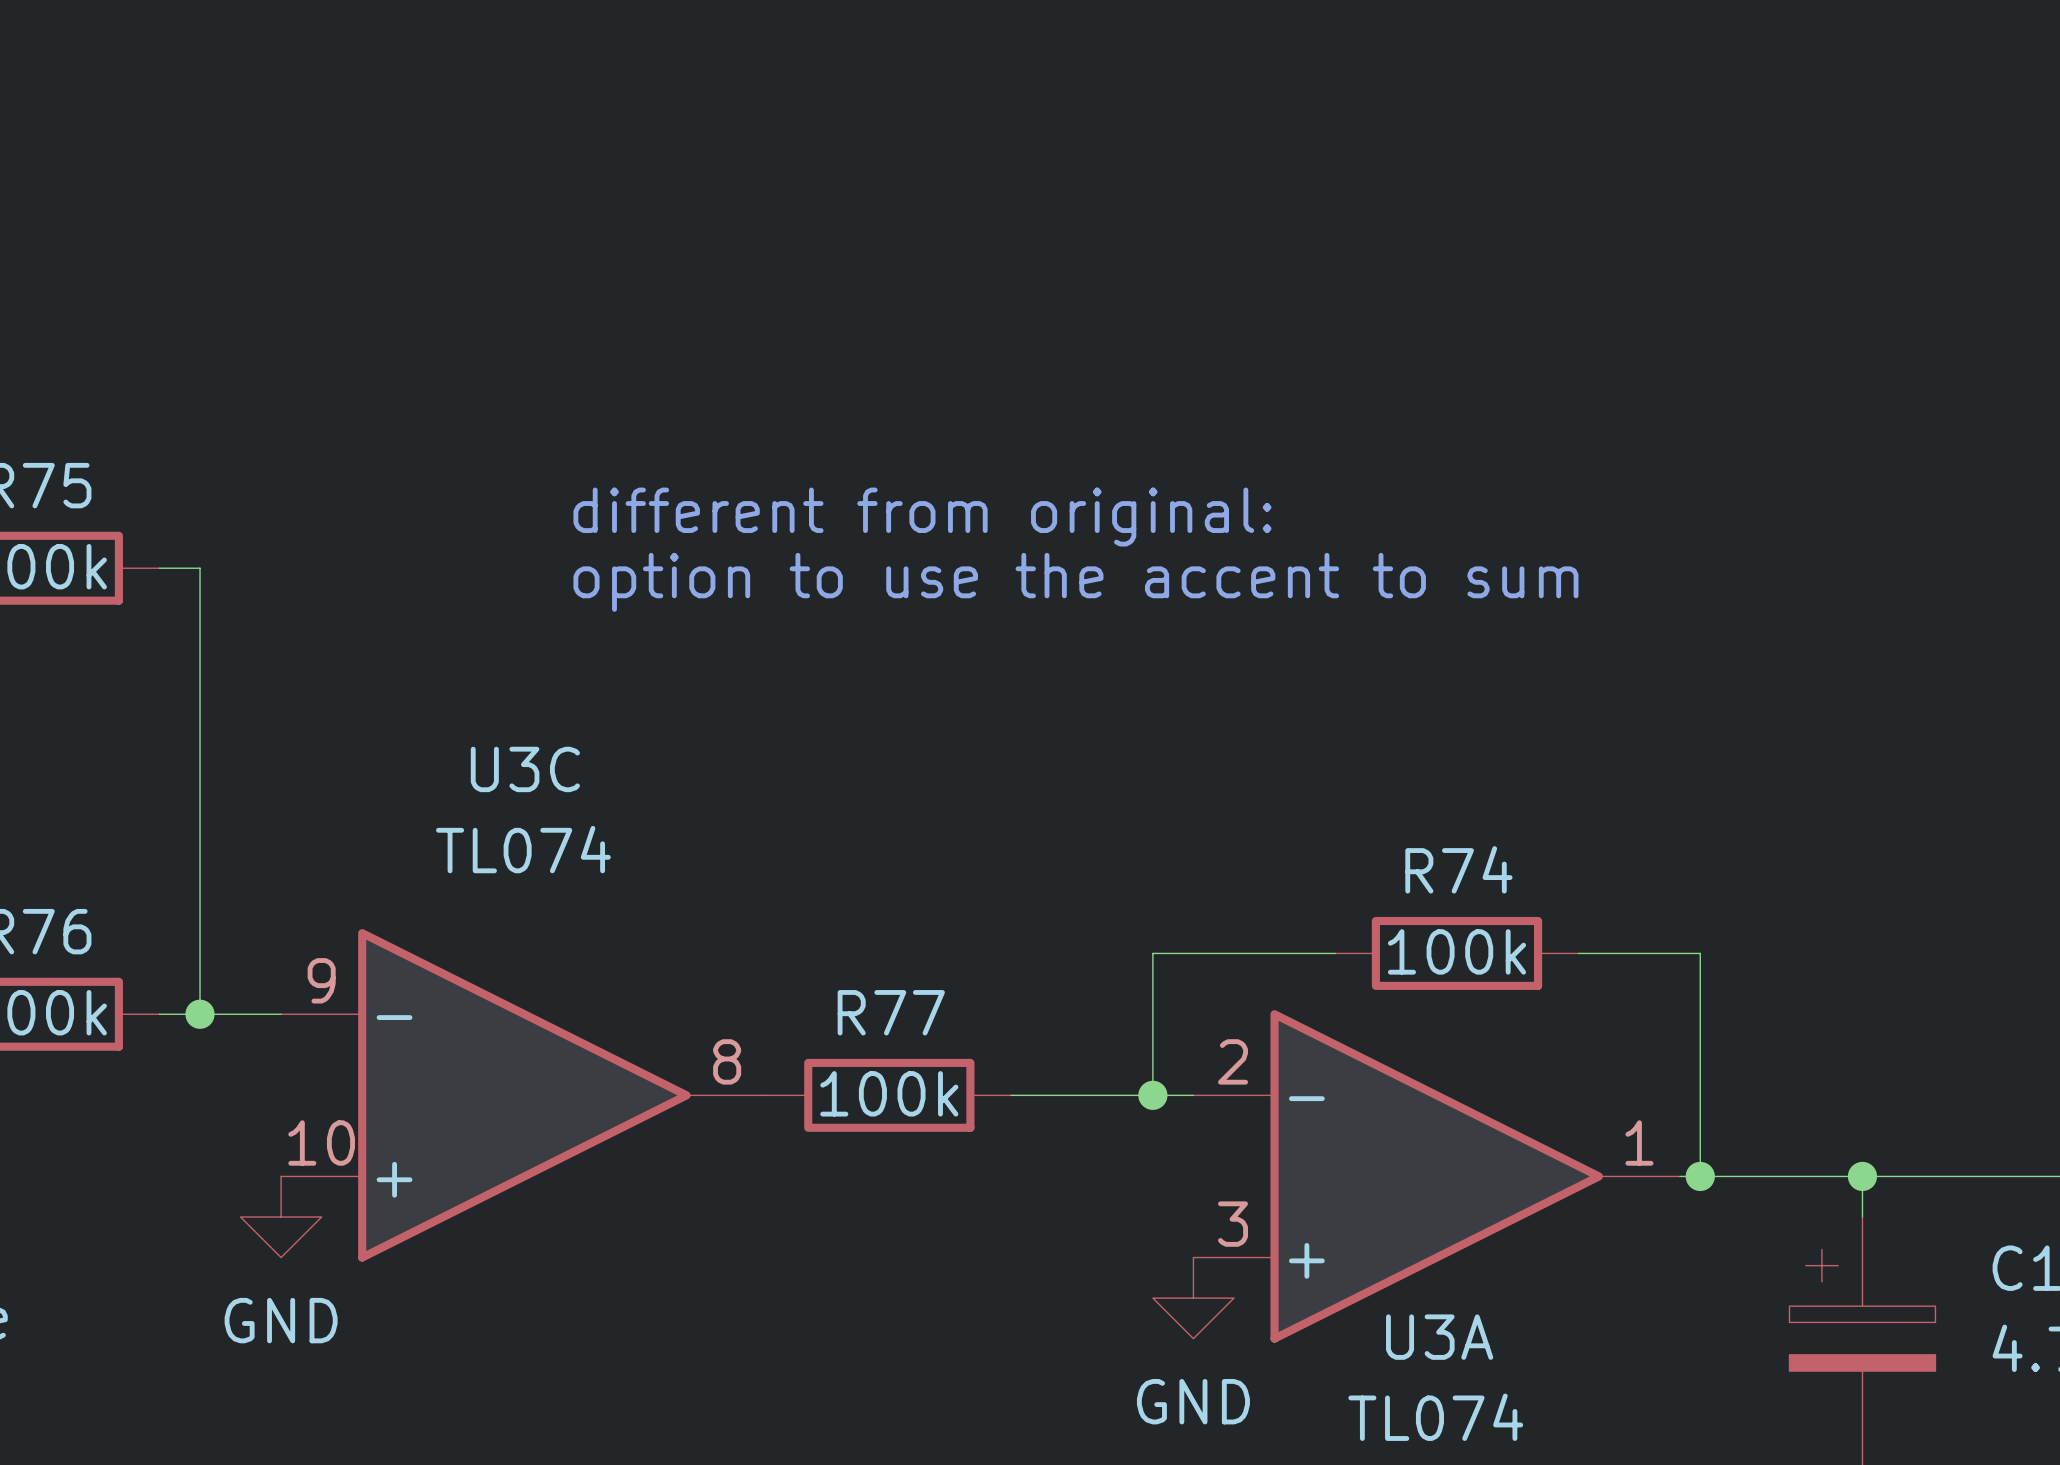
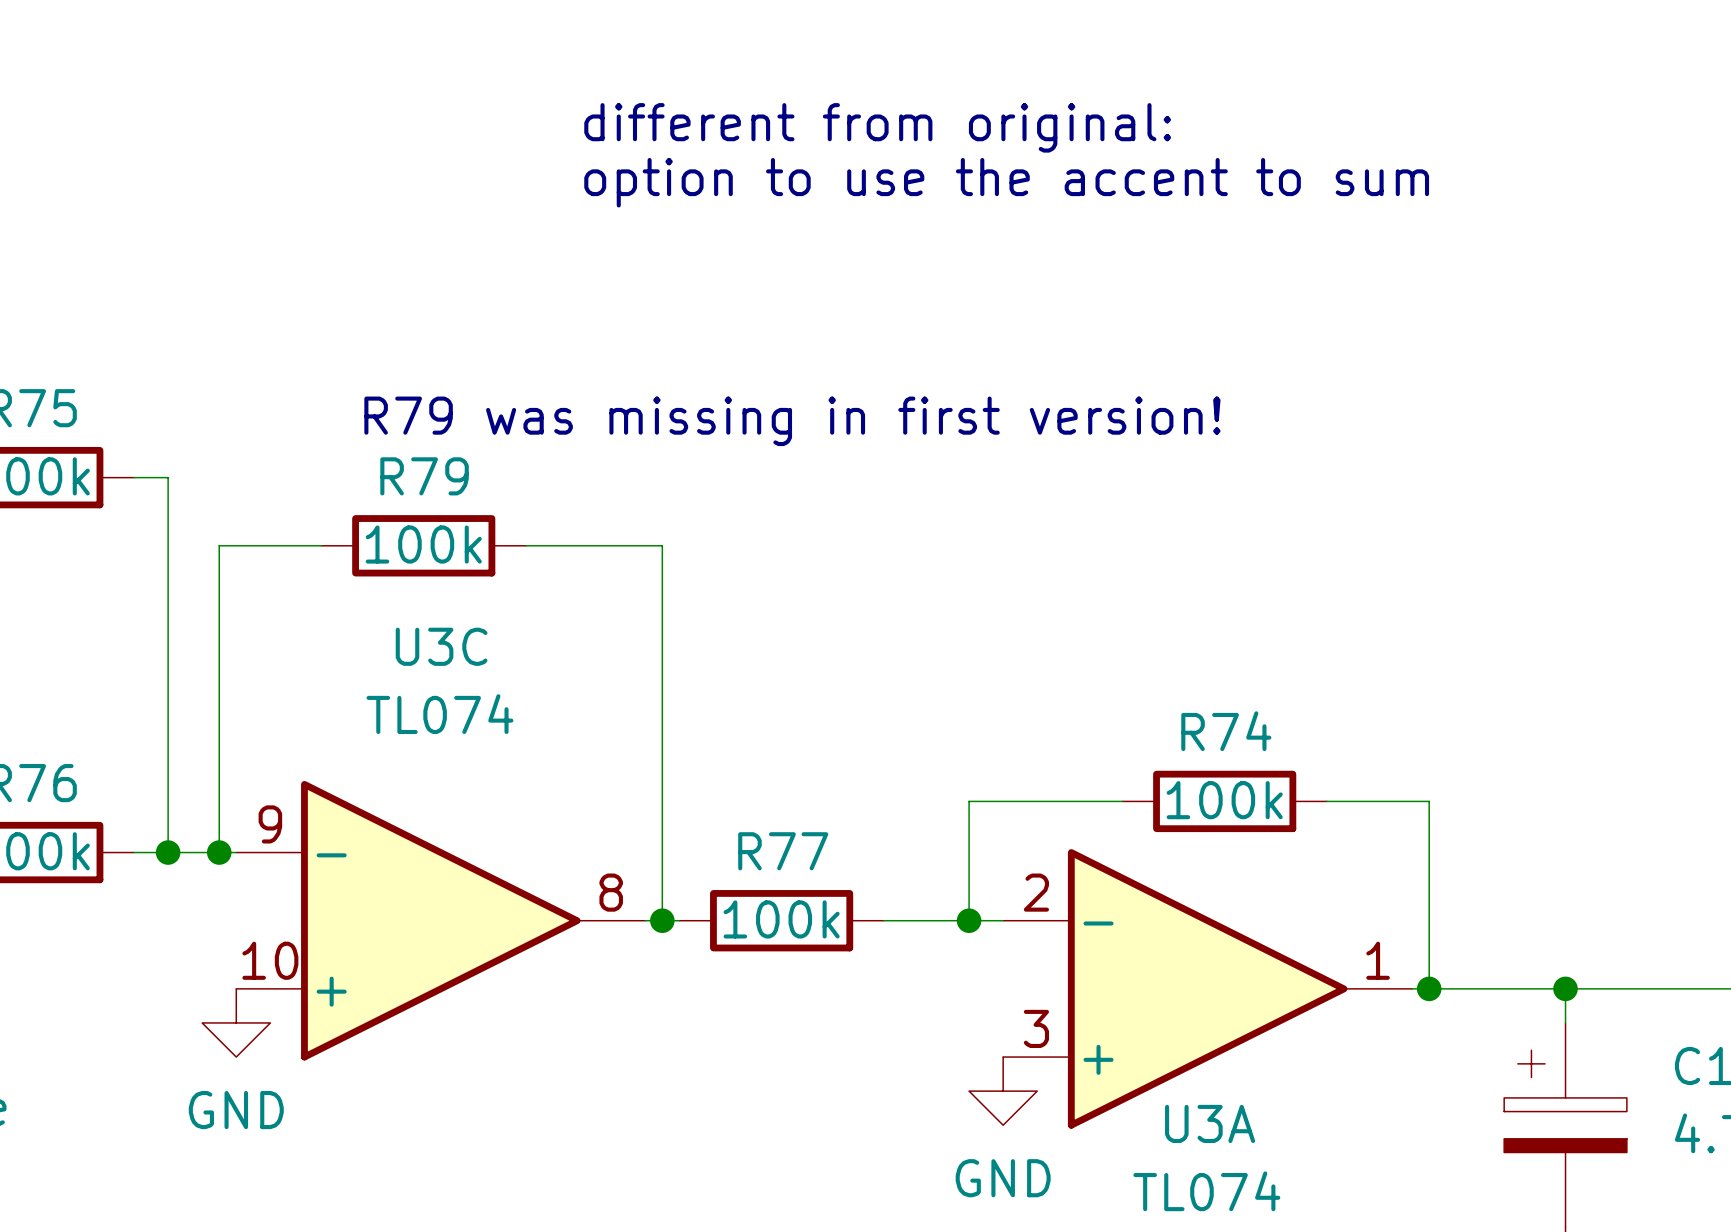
text: none -> R79 was missing in first version! (792, 421)
text position: different from original: (922, 517) -> different from original: (877, 127)
text position: option to use the accent to sum (1075, 582) -> option to use the accent to sum (1006, 182)
wire: none -> (321, 545) (219, 545) (219, 852)
R79: none -> 100k (423, 545)
wire: none -> (525, 545) (662, 545) (662, 920)
junction: none -> (219, 852)
junction: none -> (662, 920)
R77 position: (889, 1095) -> (781, 920)

